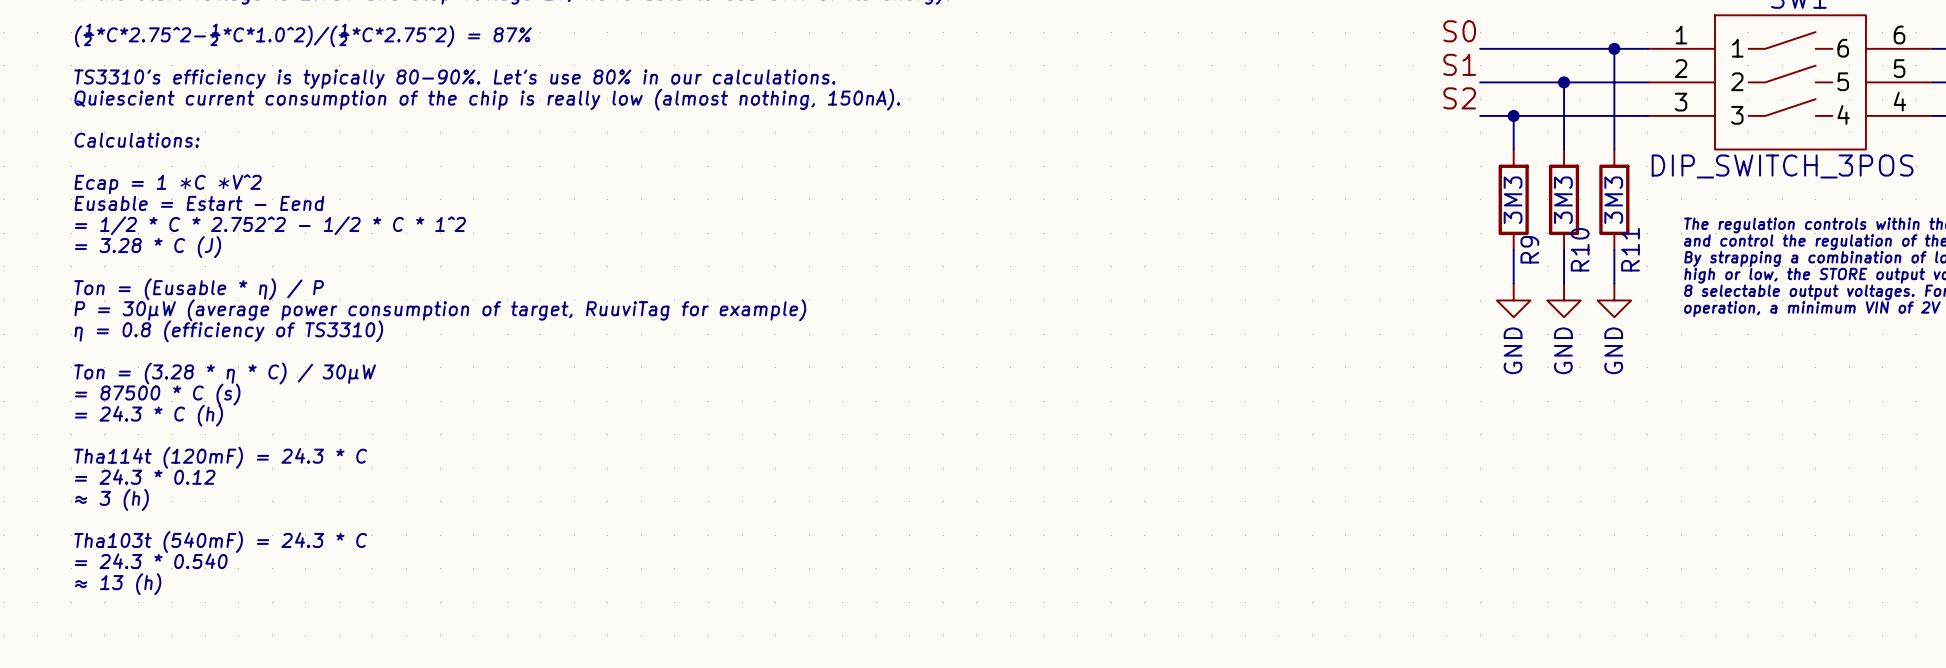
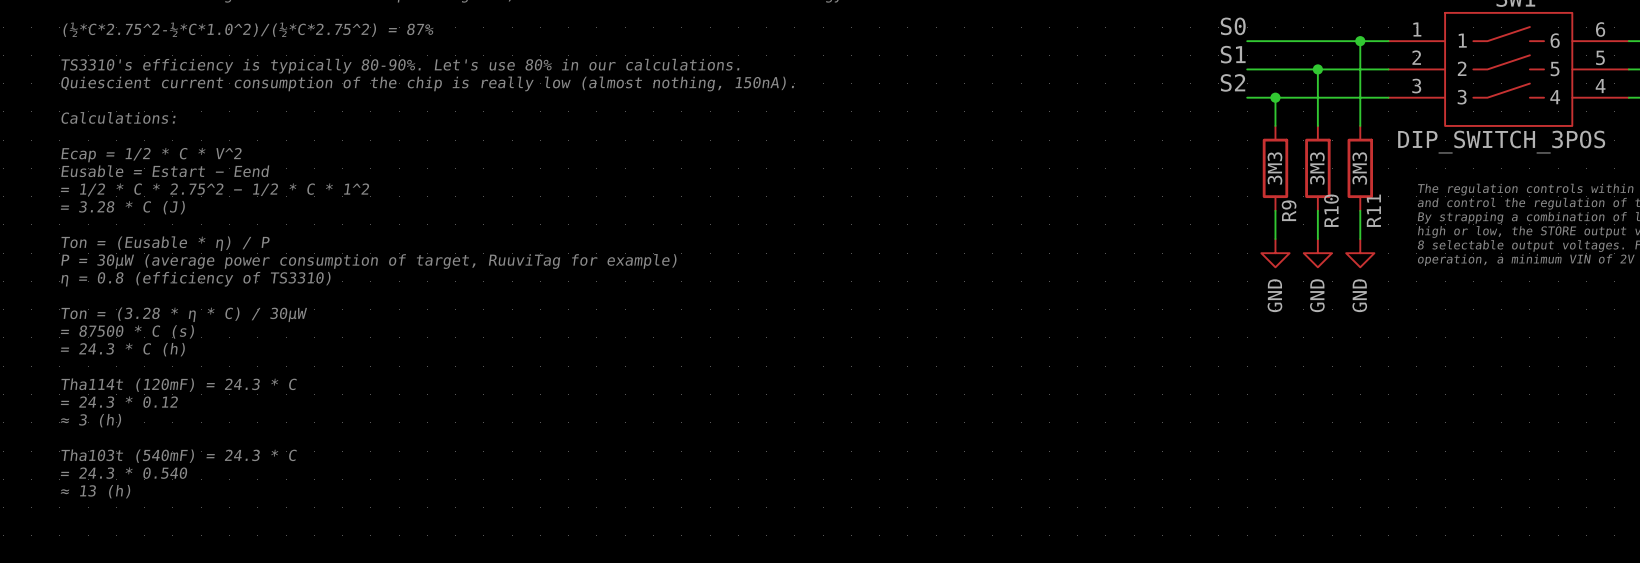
text: Ecap = 1 ∗C ∗V^2 (168, 184) -> Ecap = 1/2 * C * V^2 (151, 155)
text: = 1/2 * C * 2.752^2 − 1/2 * C * 1^2 (270, 225) -> = 1/2 * C * 2.75^2 − 1/2 * C * 1^2 (215, 189)

